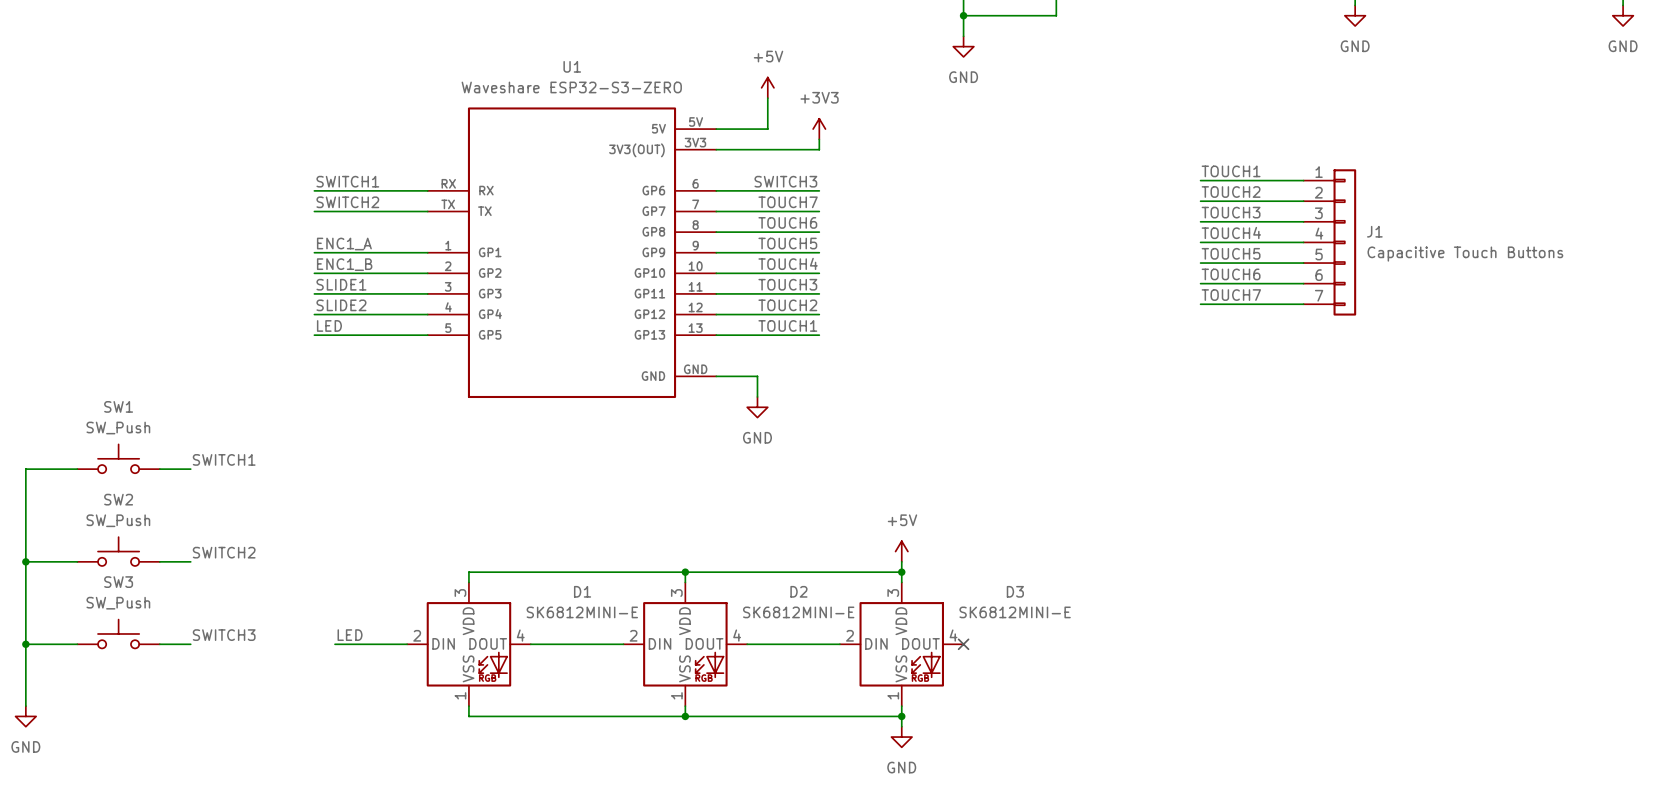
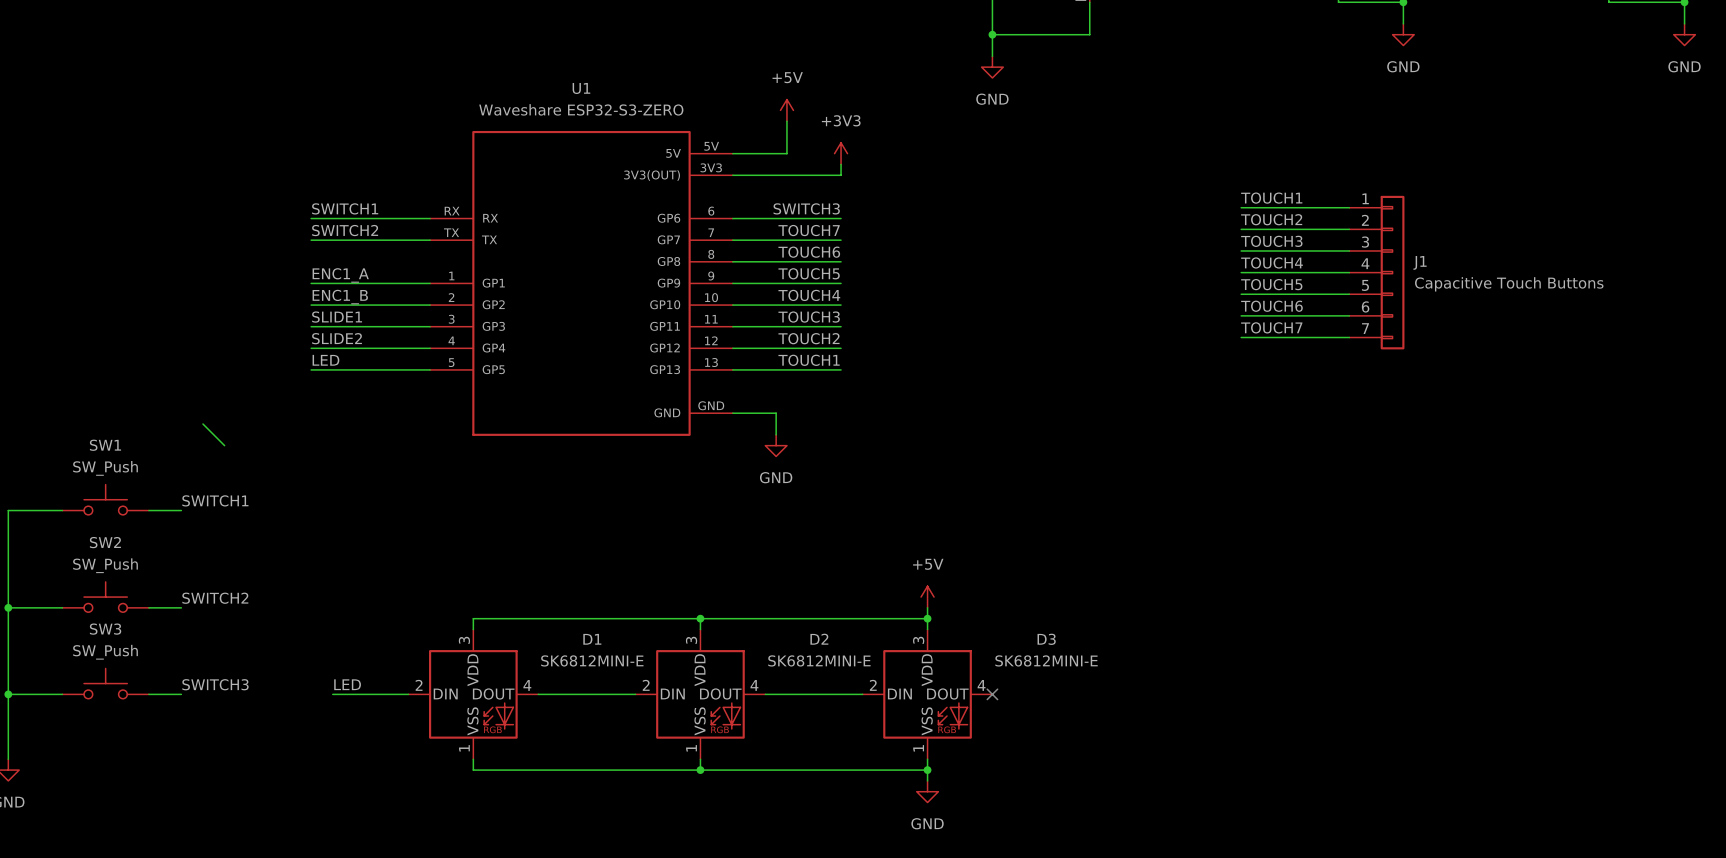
wire: none -> (202, 424) (224, 445)

